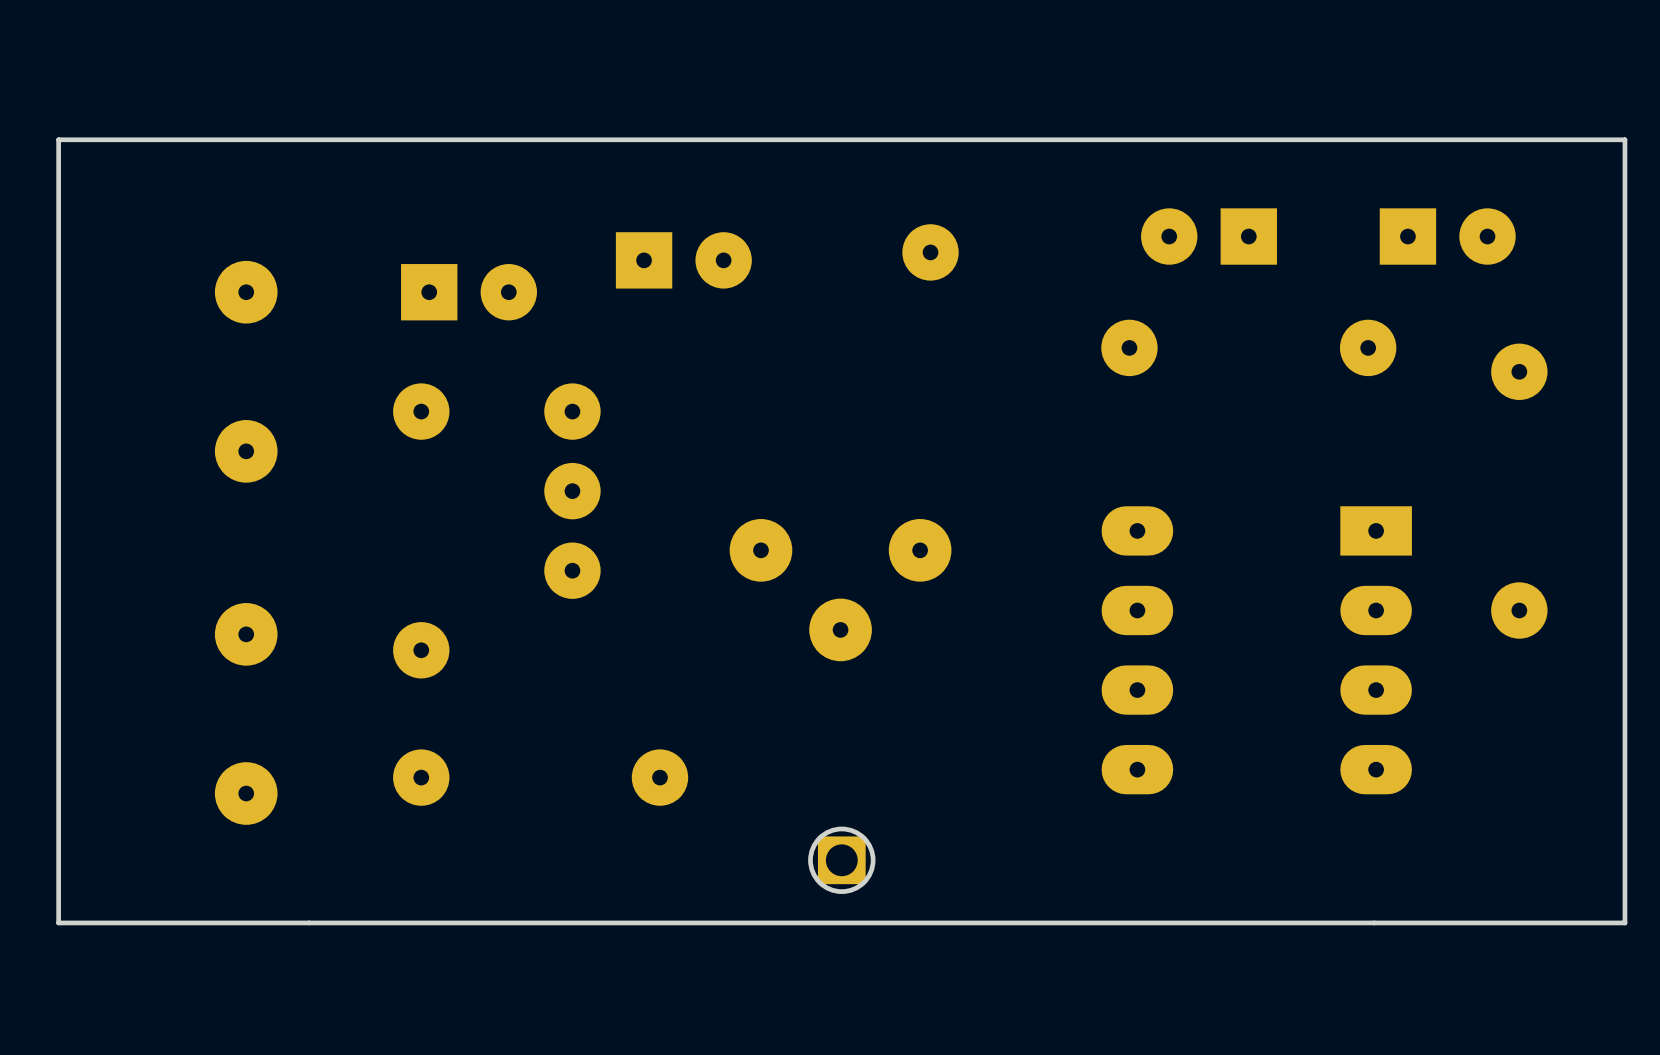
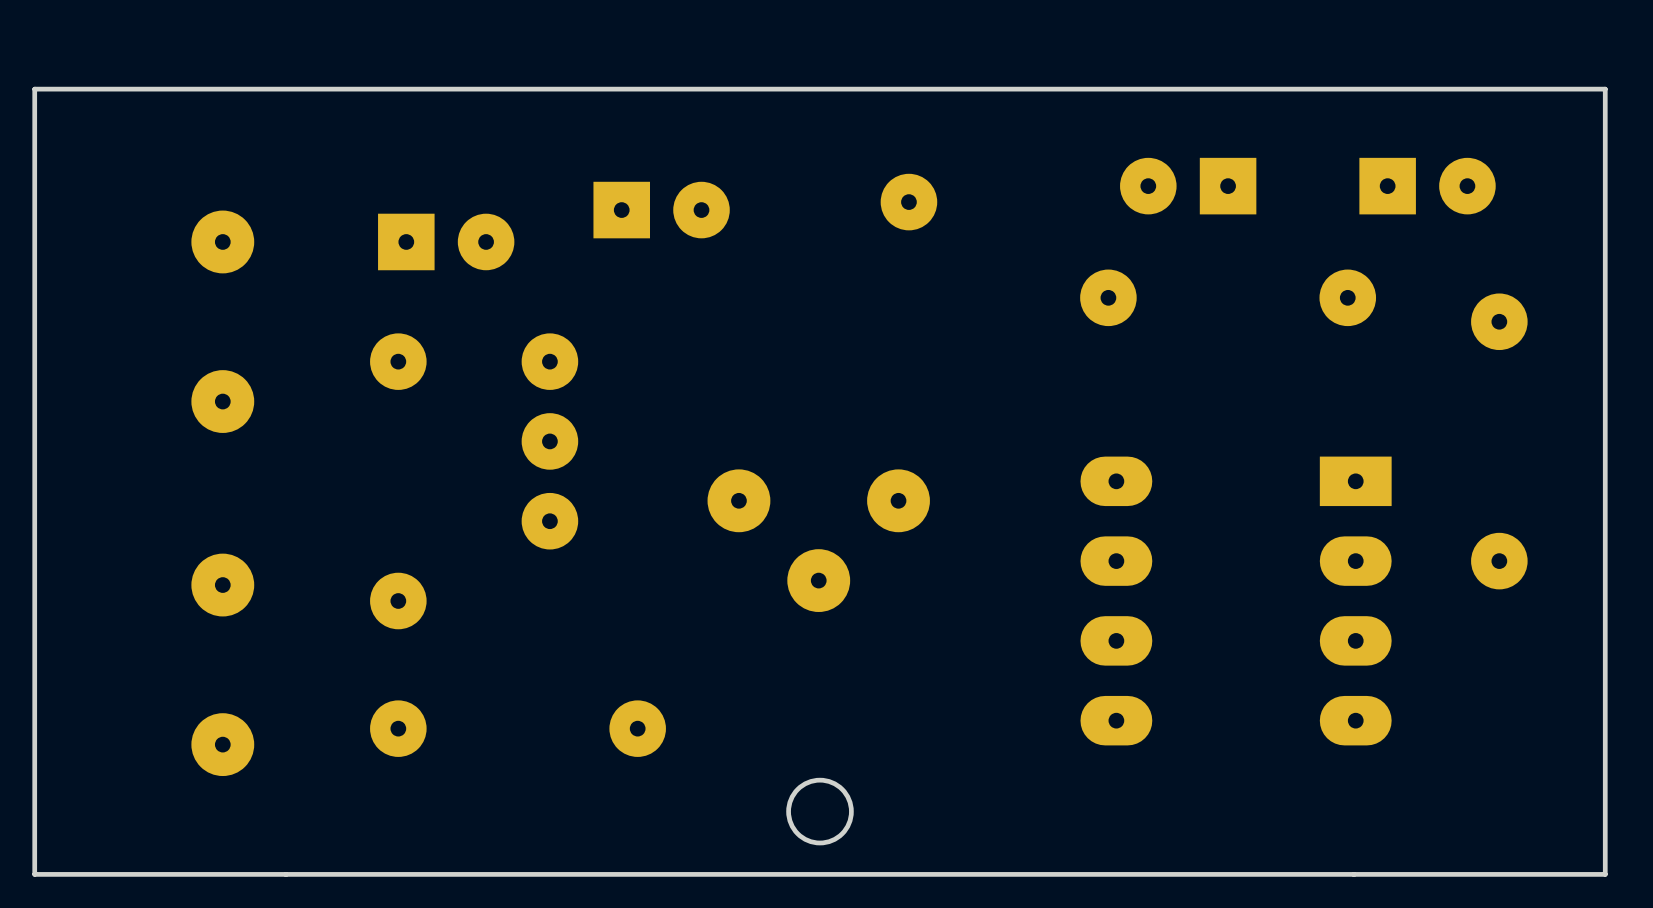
part: (841, 860) -> none

